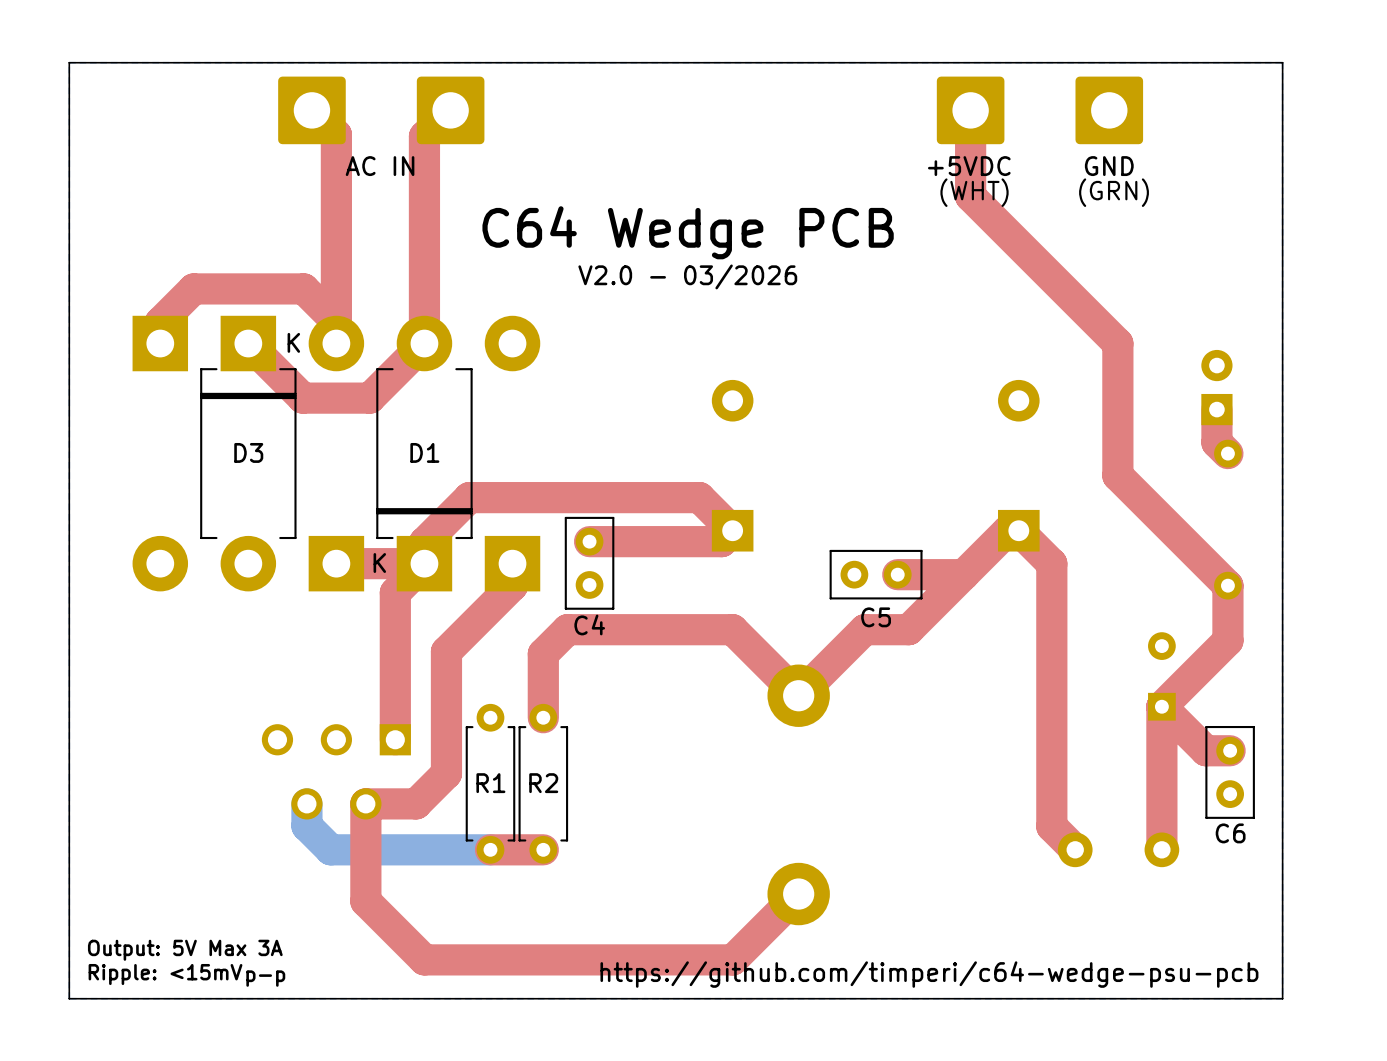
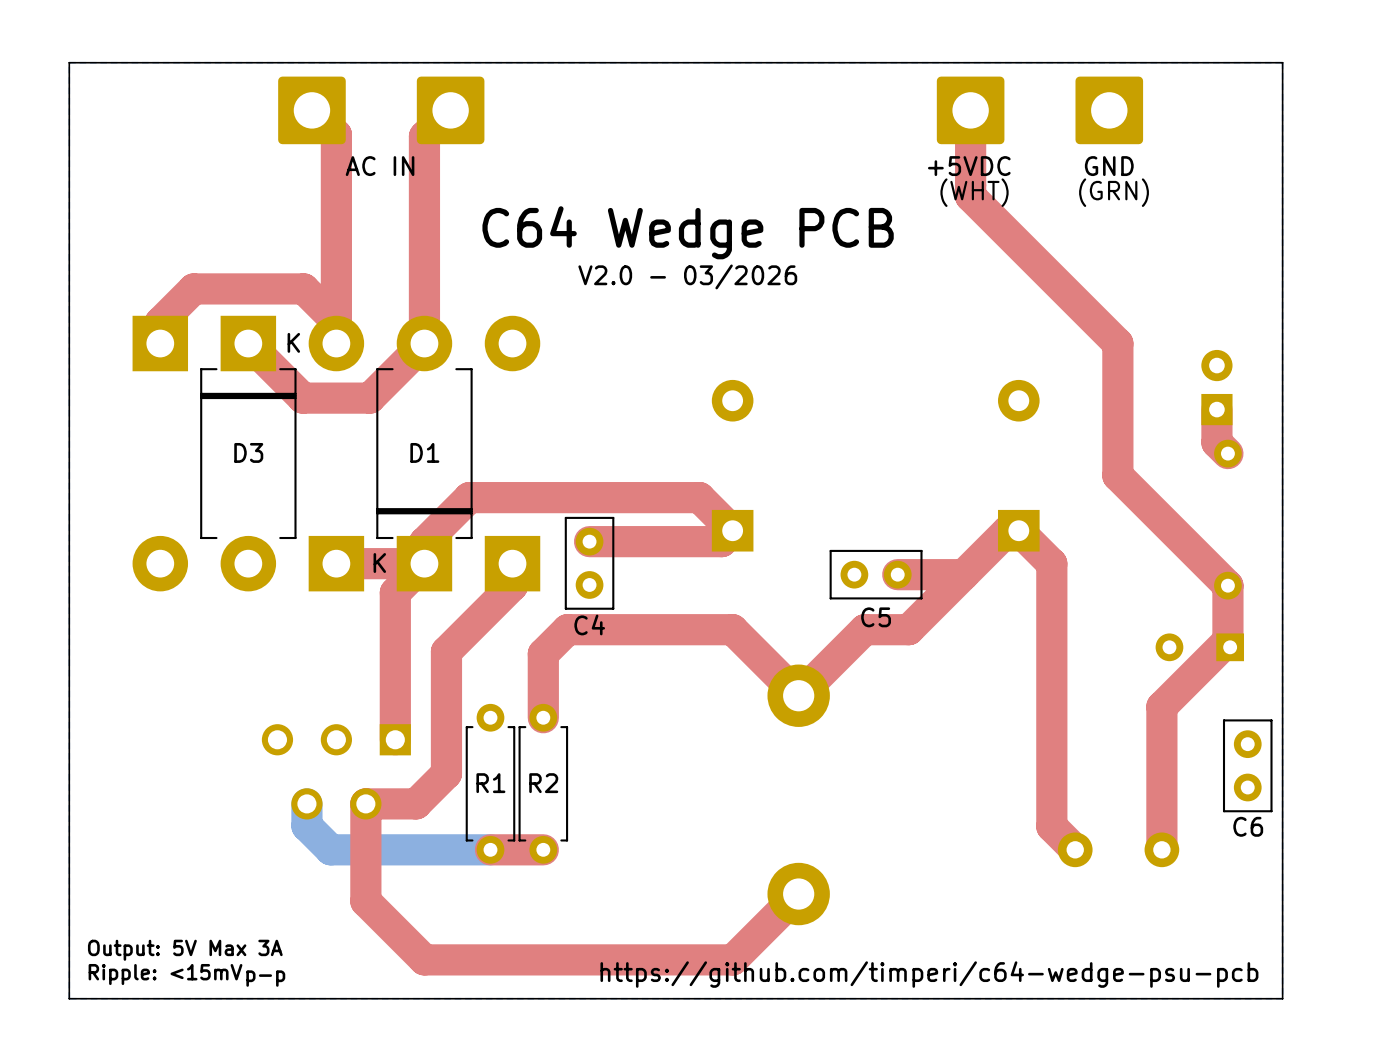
part rotation: 0° (1161, 676) -> 90° counterclockwise (1199, 647)
top track: (1161, 706) (1205, 750) (1230, 750) -> none
C6 position: (1230, 772) -> (1247, 765)

